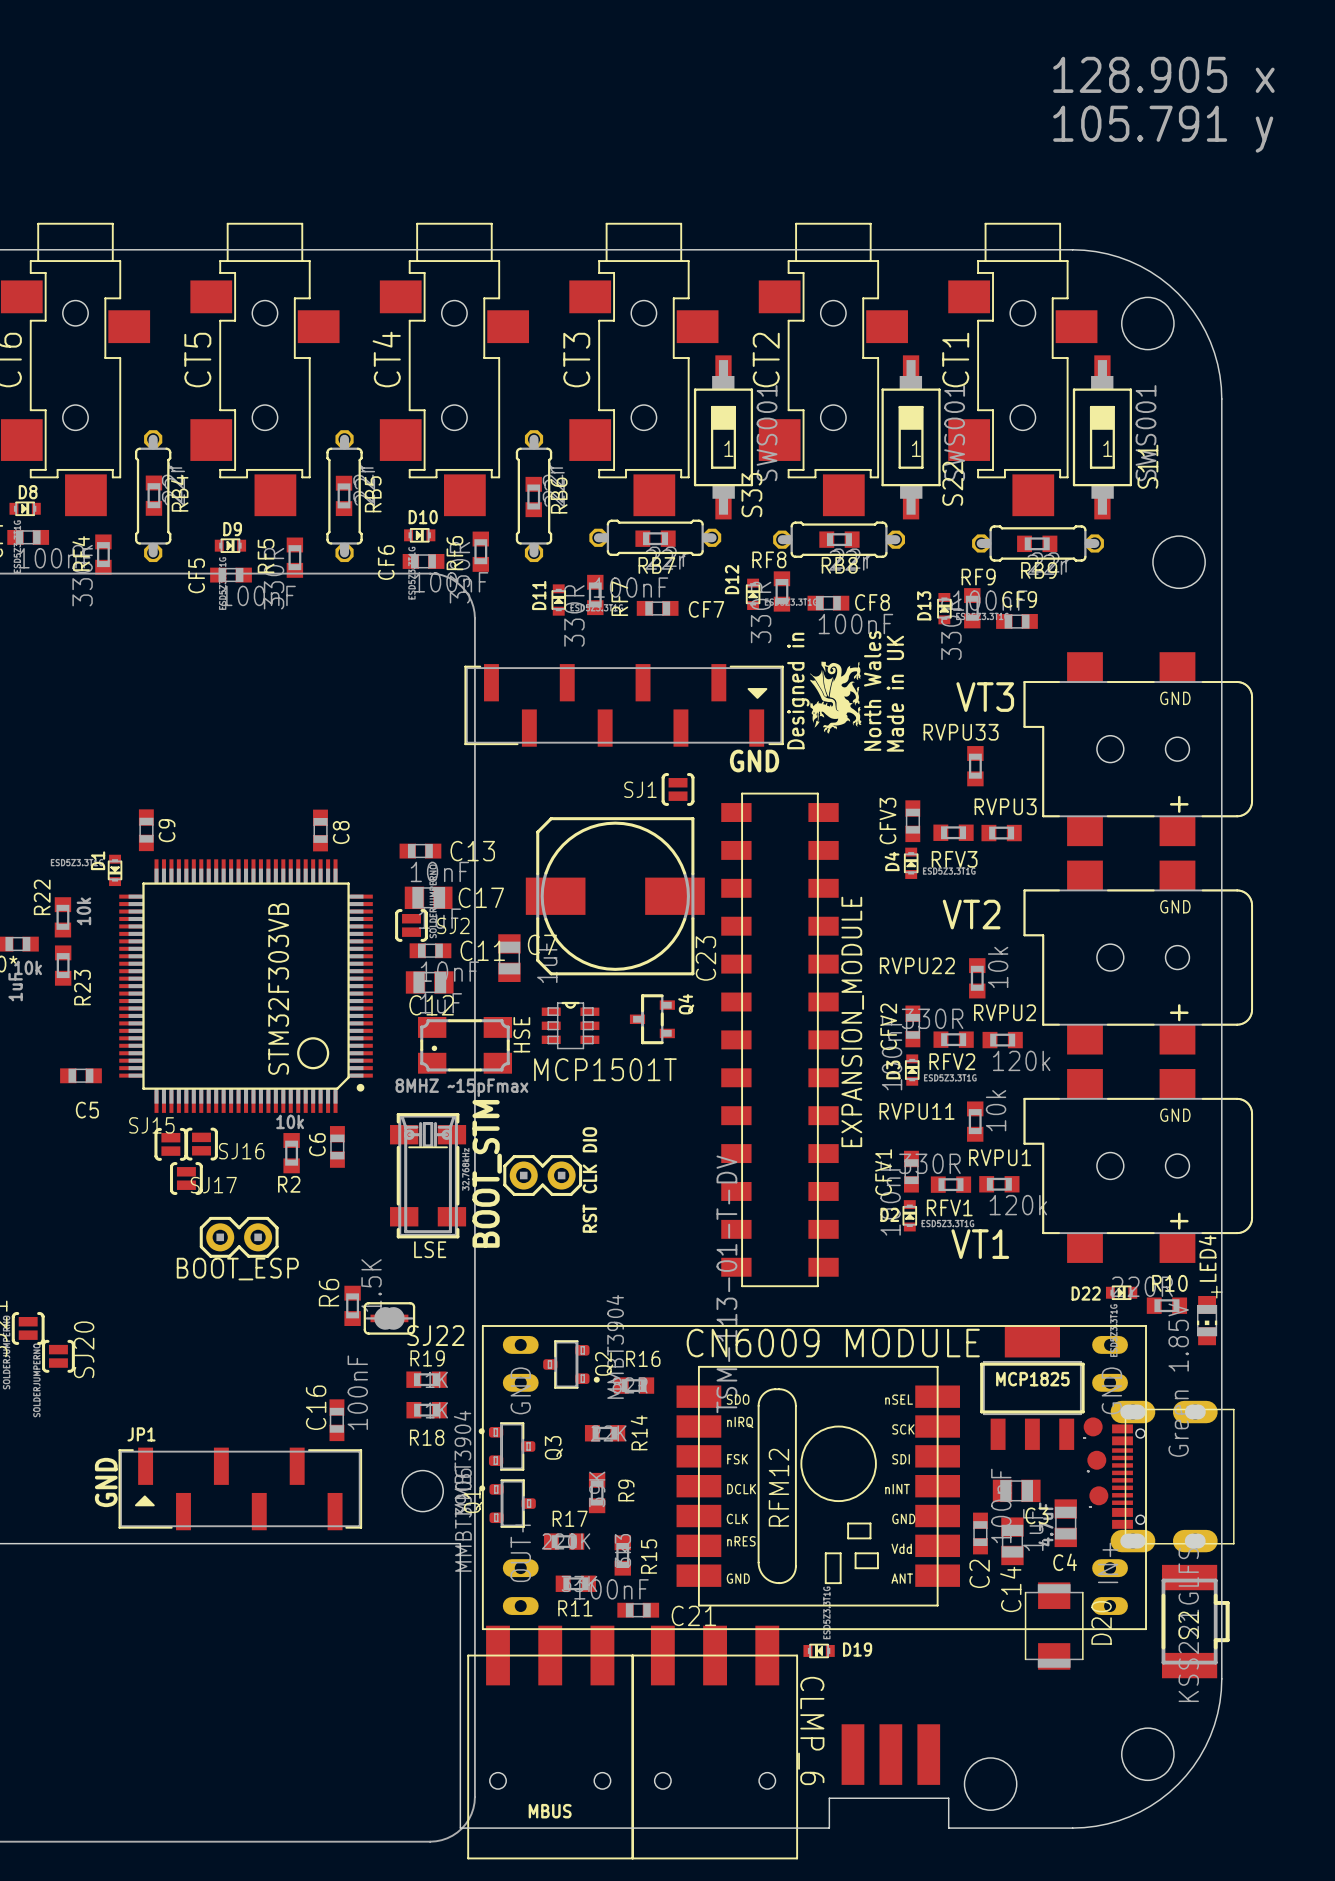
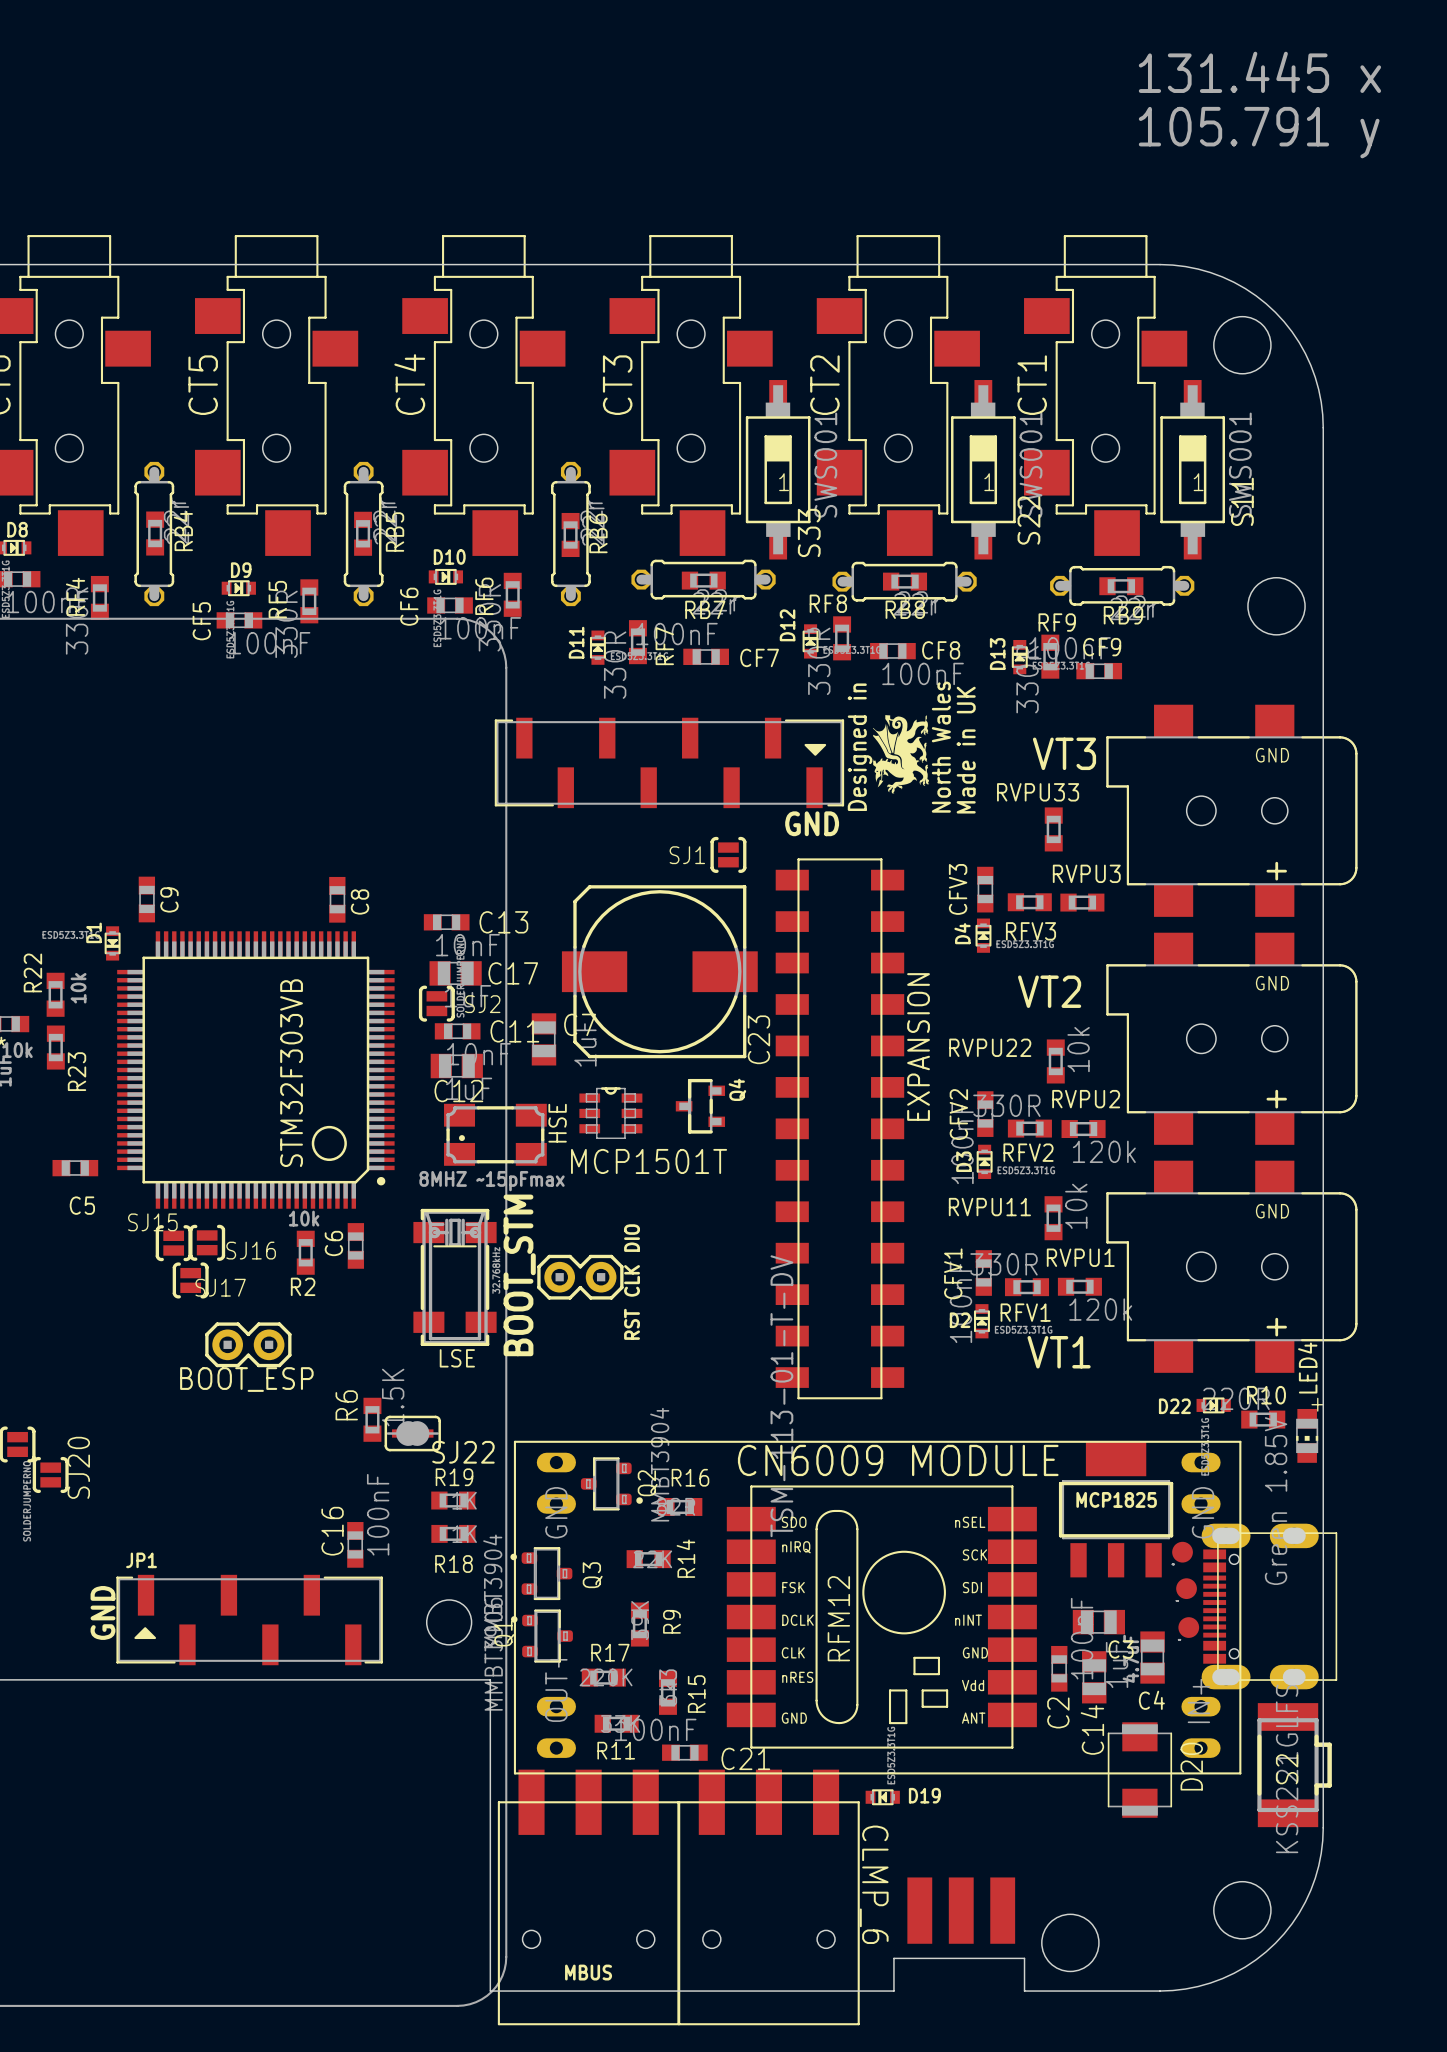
text: 128.905 x (1163, 74) -> 131.445 x (1259, 72)
EXPANSION_MODULE name: EXPANSION_MODULE (852, 1021) -> EXPANSION (918, 1047)

